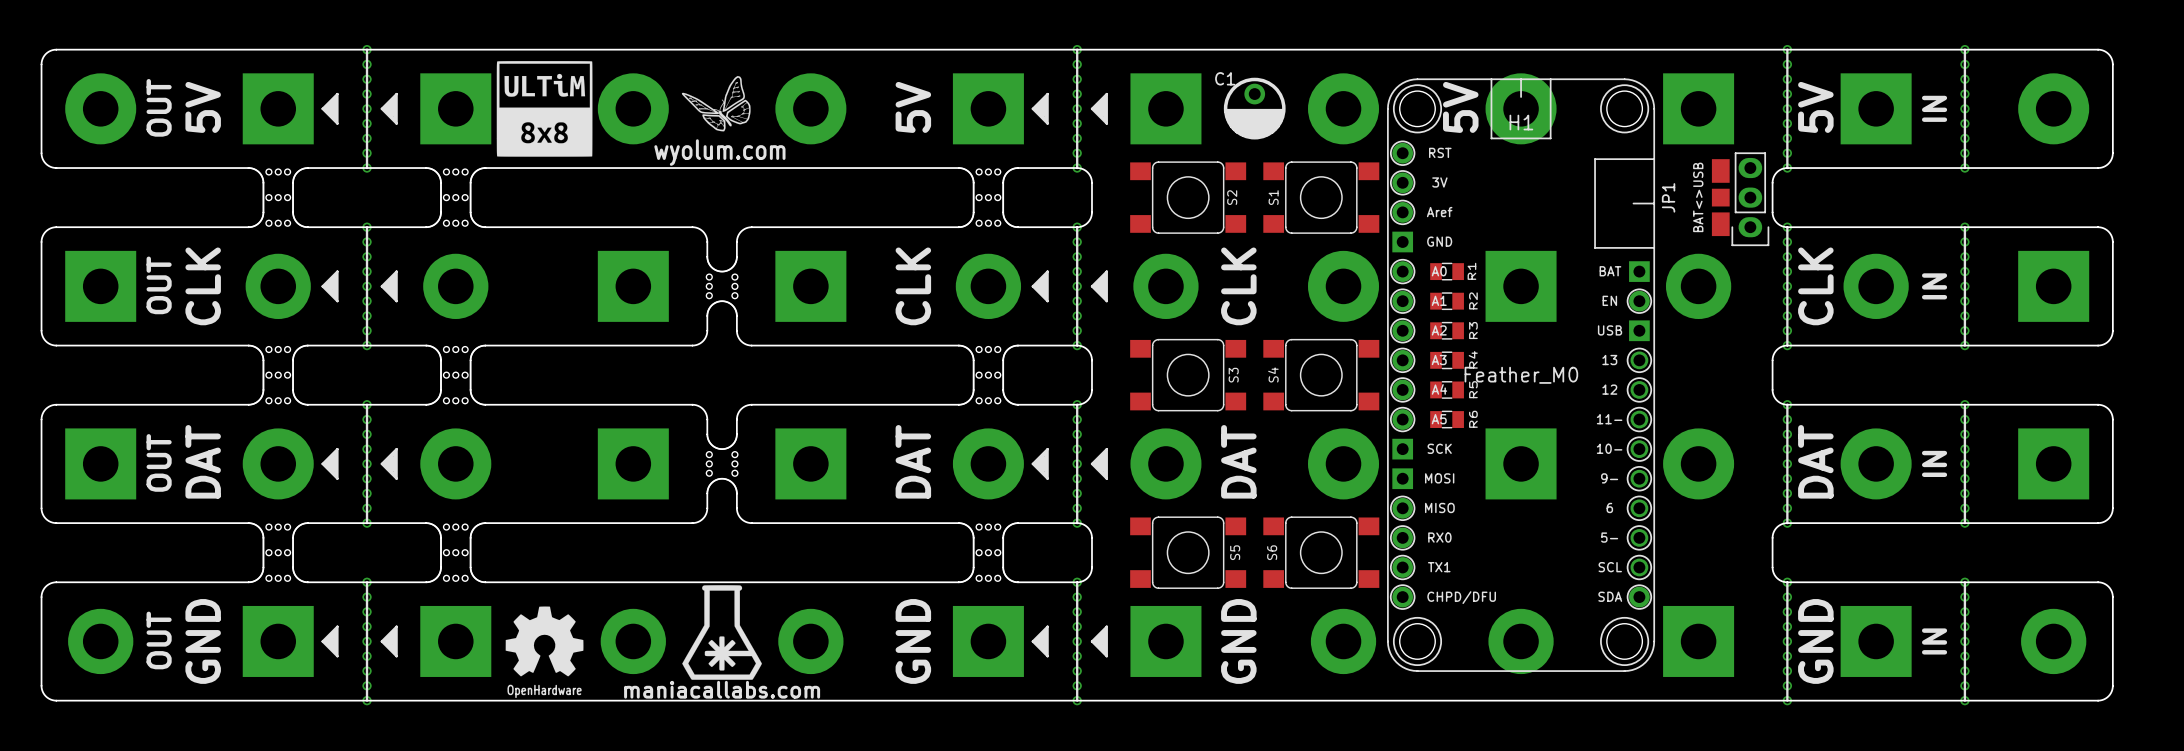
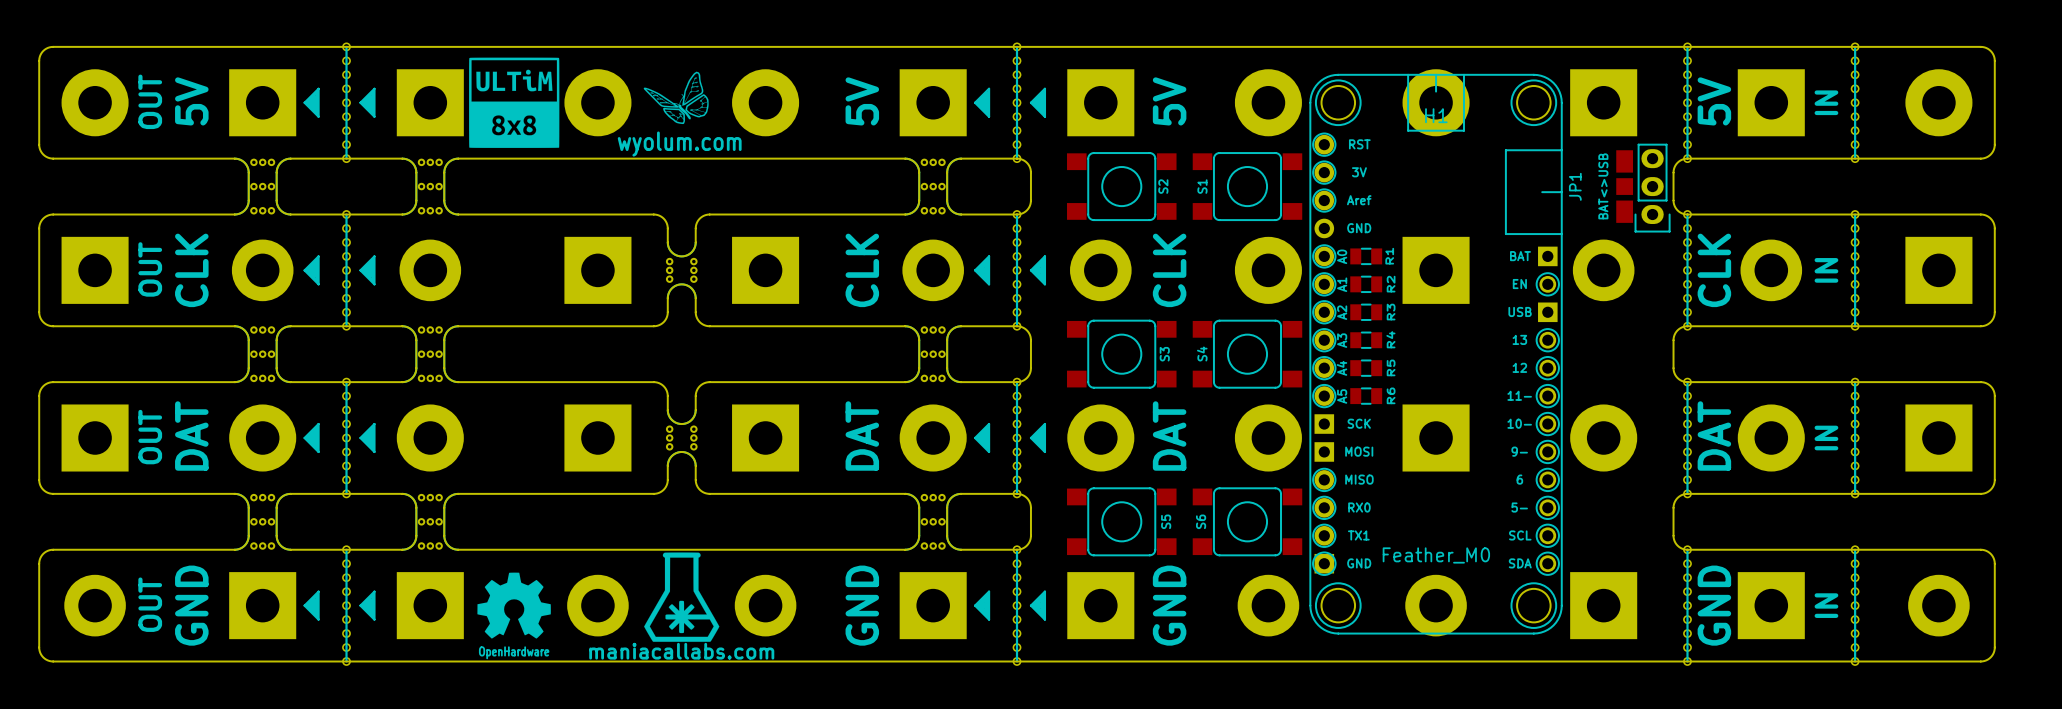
H1 footprint: [1387, 78, 1656, 672] -> [1309, 73, 1563, 635]
text position: 5V (1460, 107) -> 5V (1169, 101)
C1: (1254, 108) -> none
H1 value position: Feather_M0 (1521, 375) -> Feather_M0 (1436, 555)

